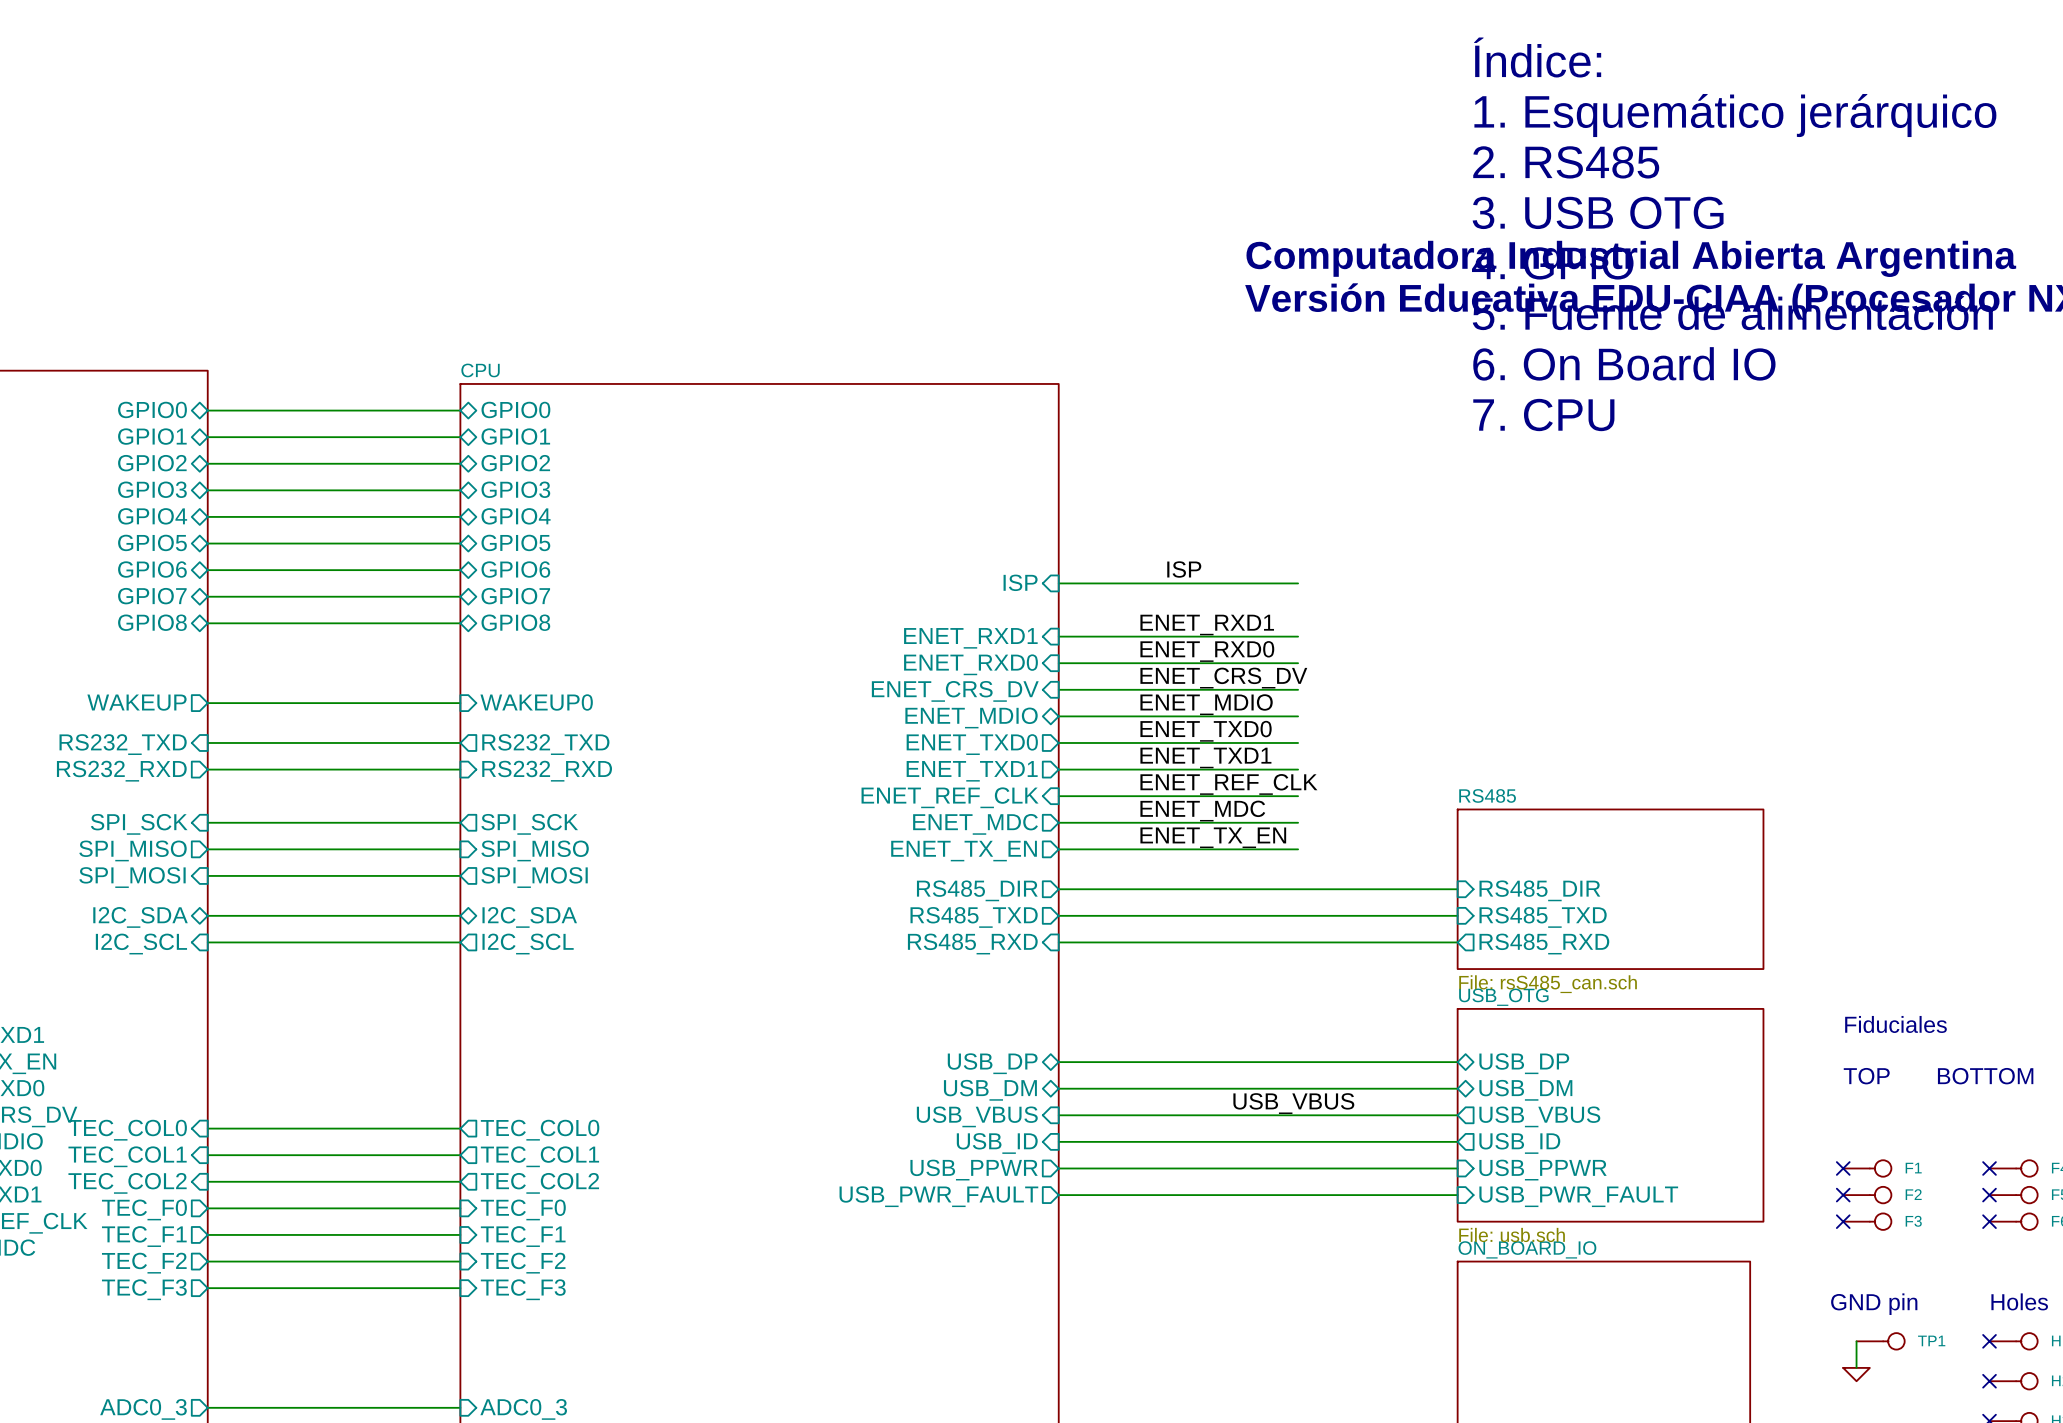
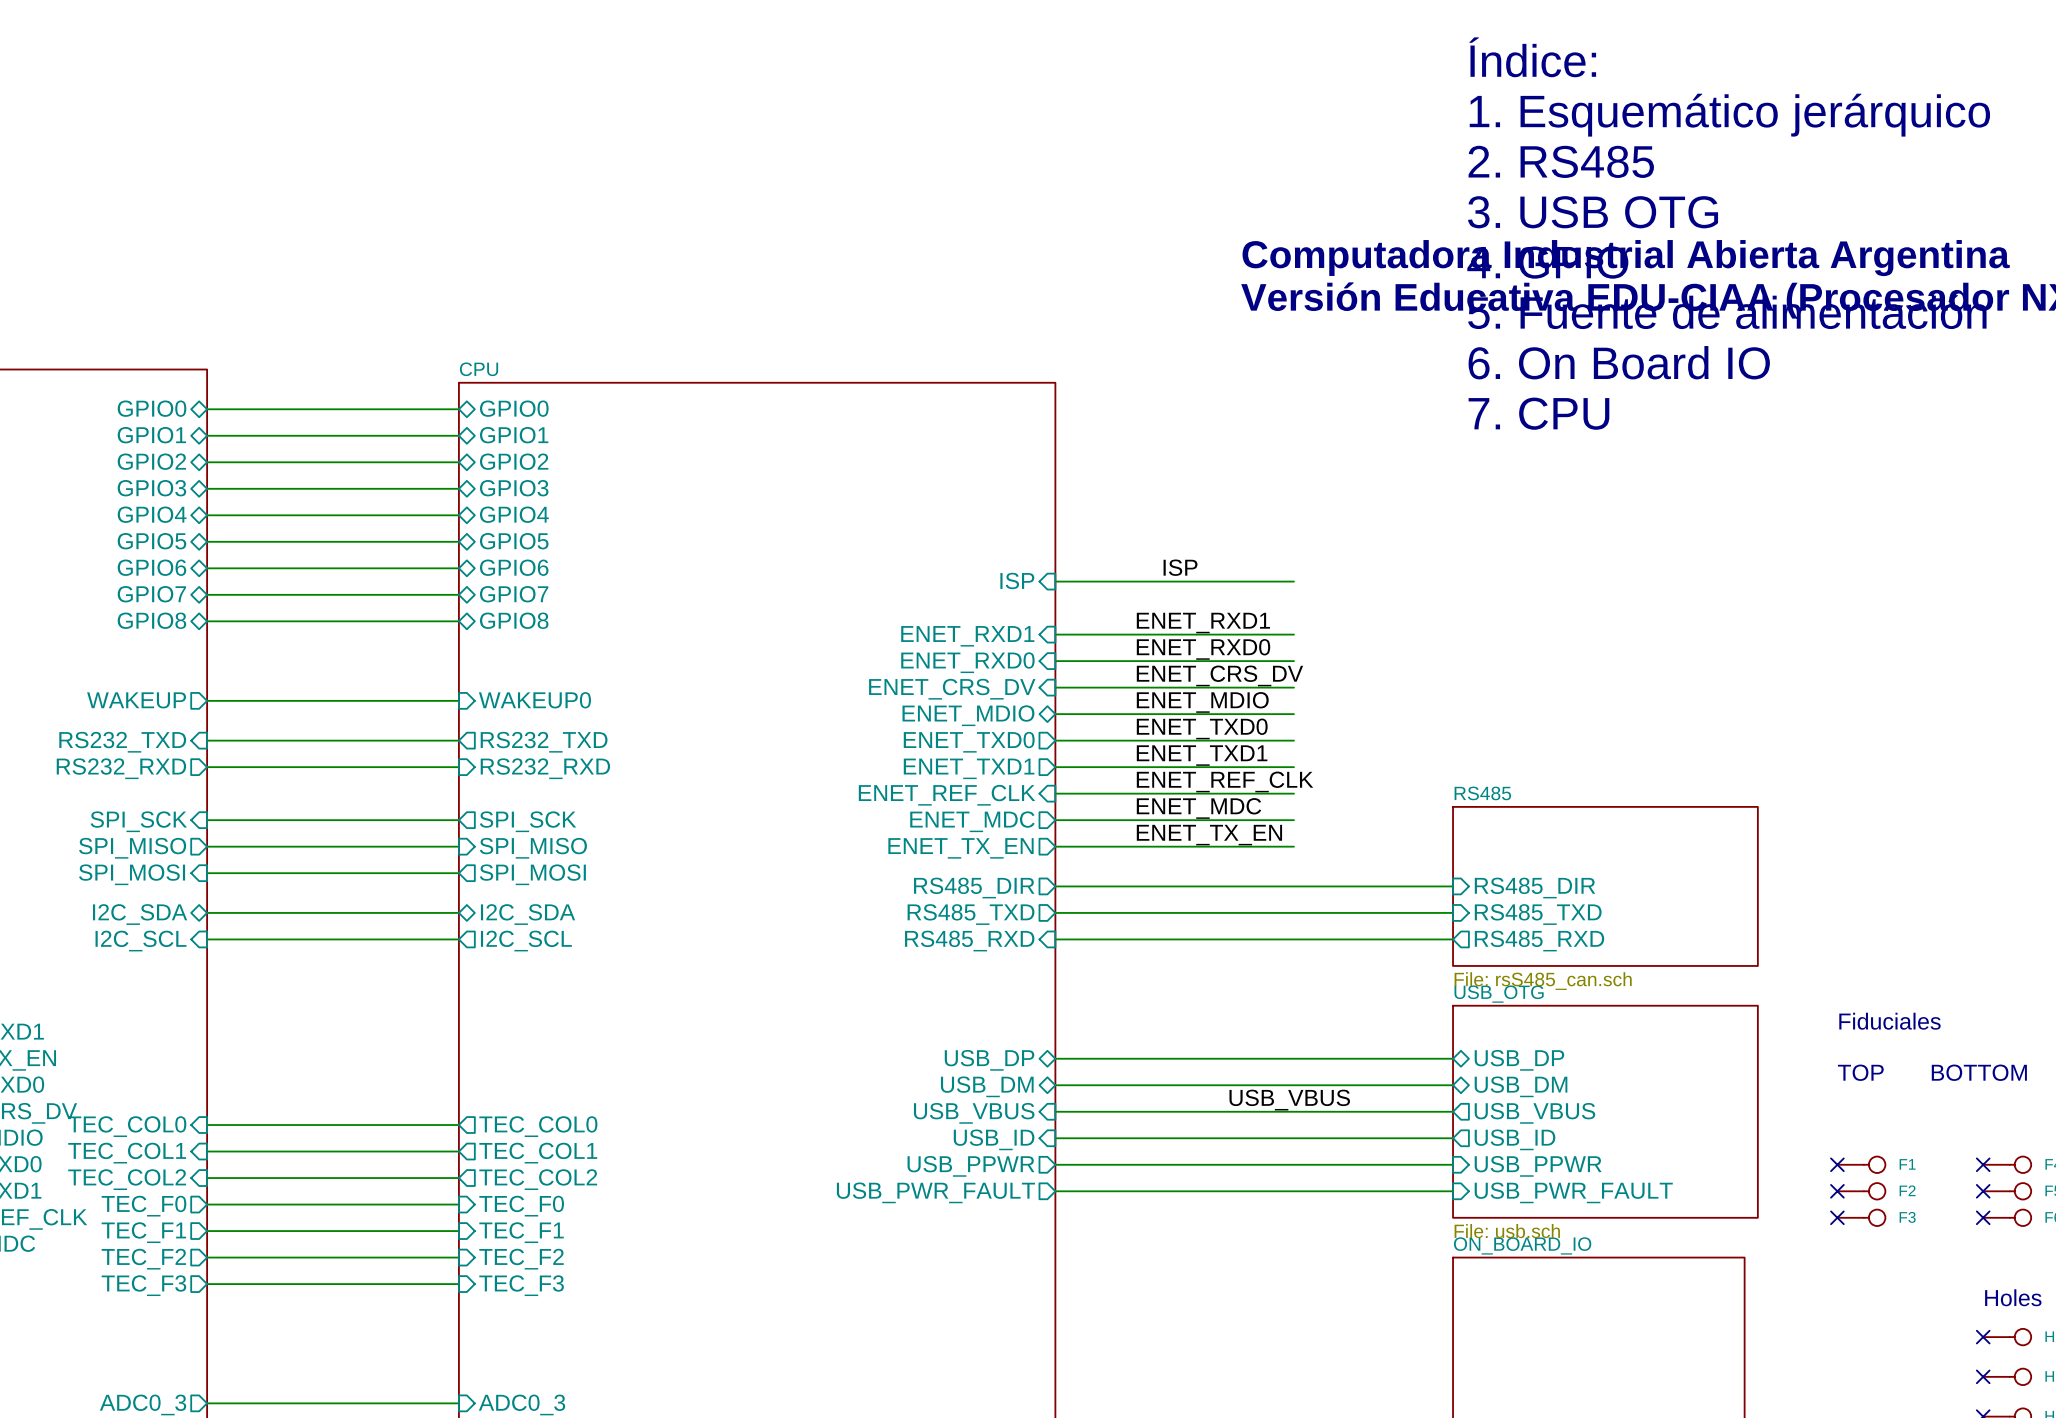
text: GND pin (1874, 1304) -> none
wire: (1856, 1341) (1856, 1367) -> none
TP1: (1880, 1341) -> none
power symbol: (1856, 1374) -> none

